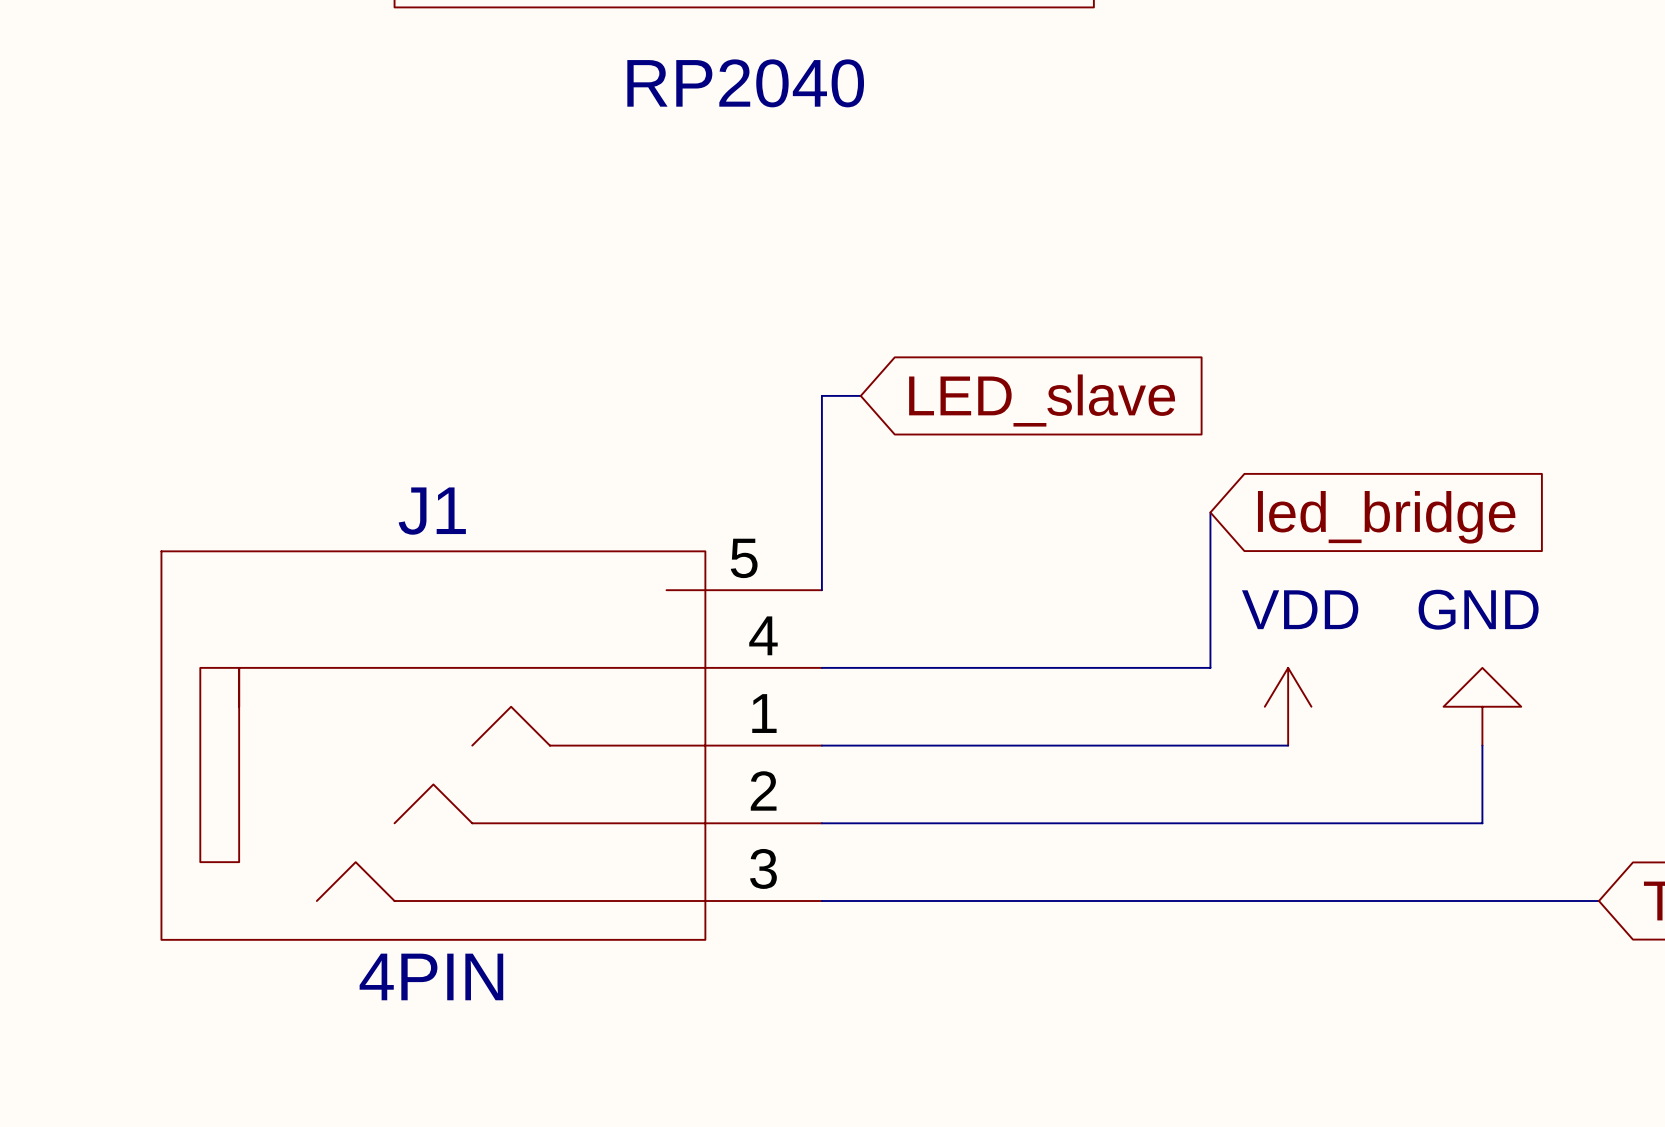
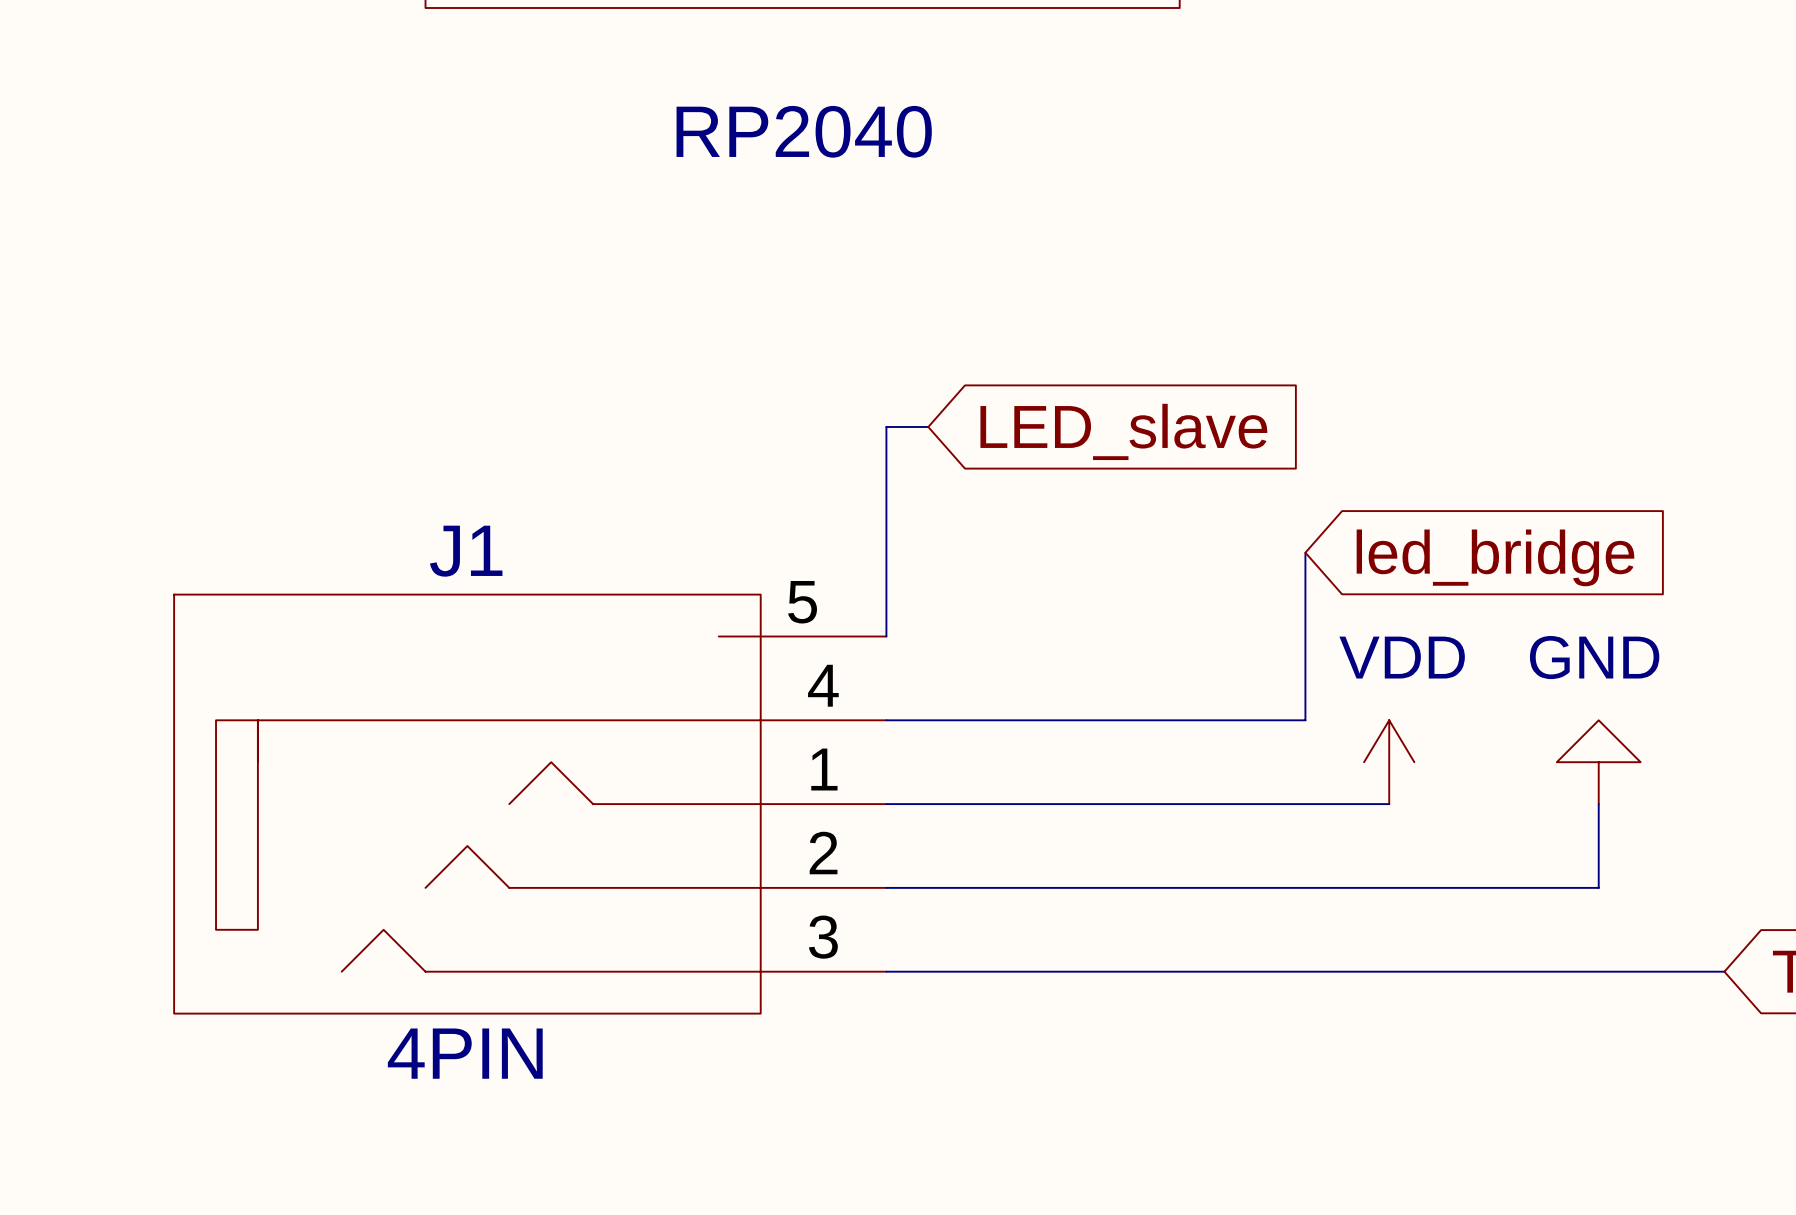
part value position: RP2040 (745, 83) -> RP2040 (804, 131)

